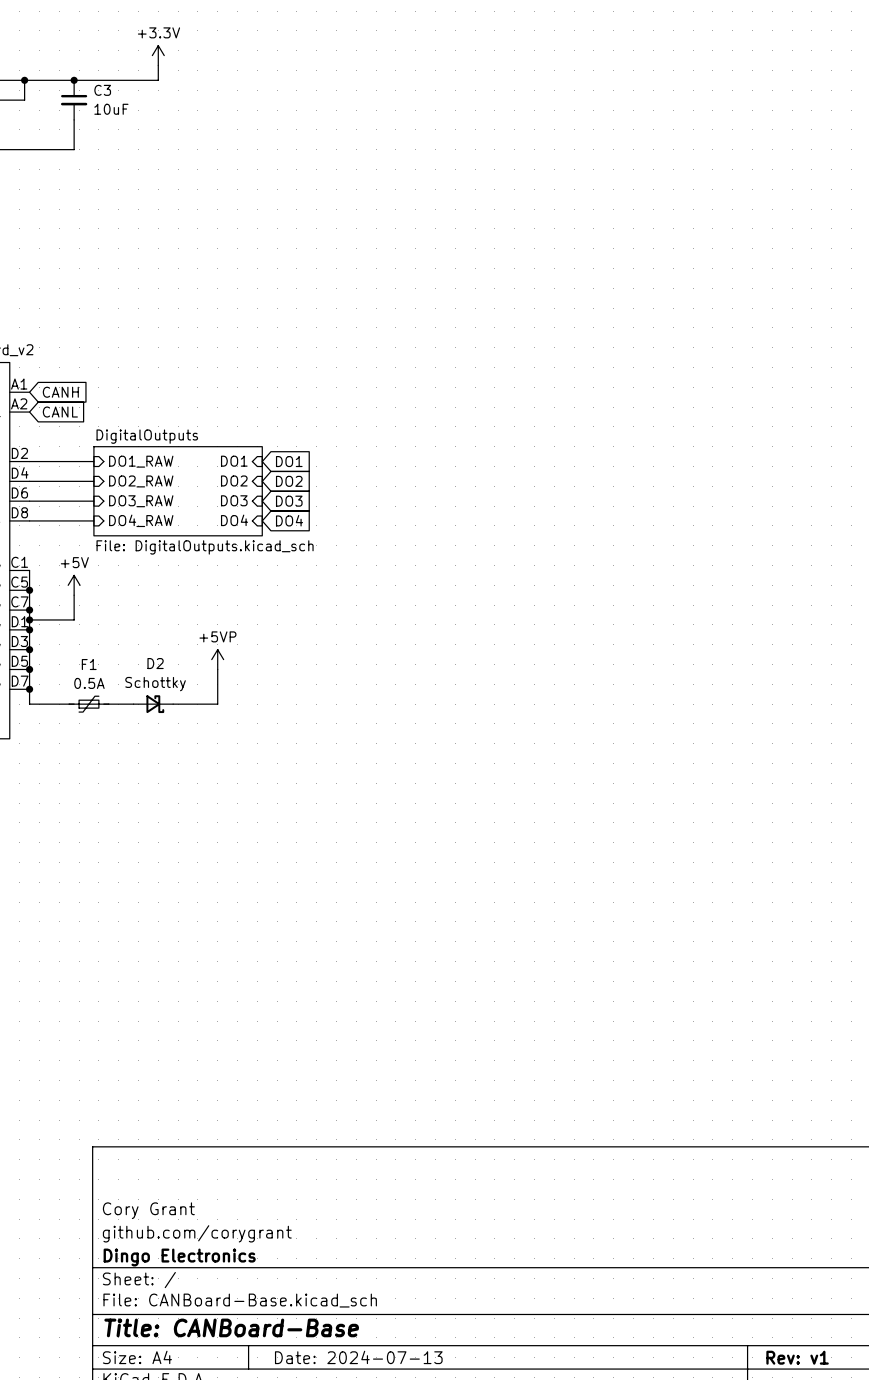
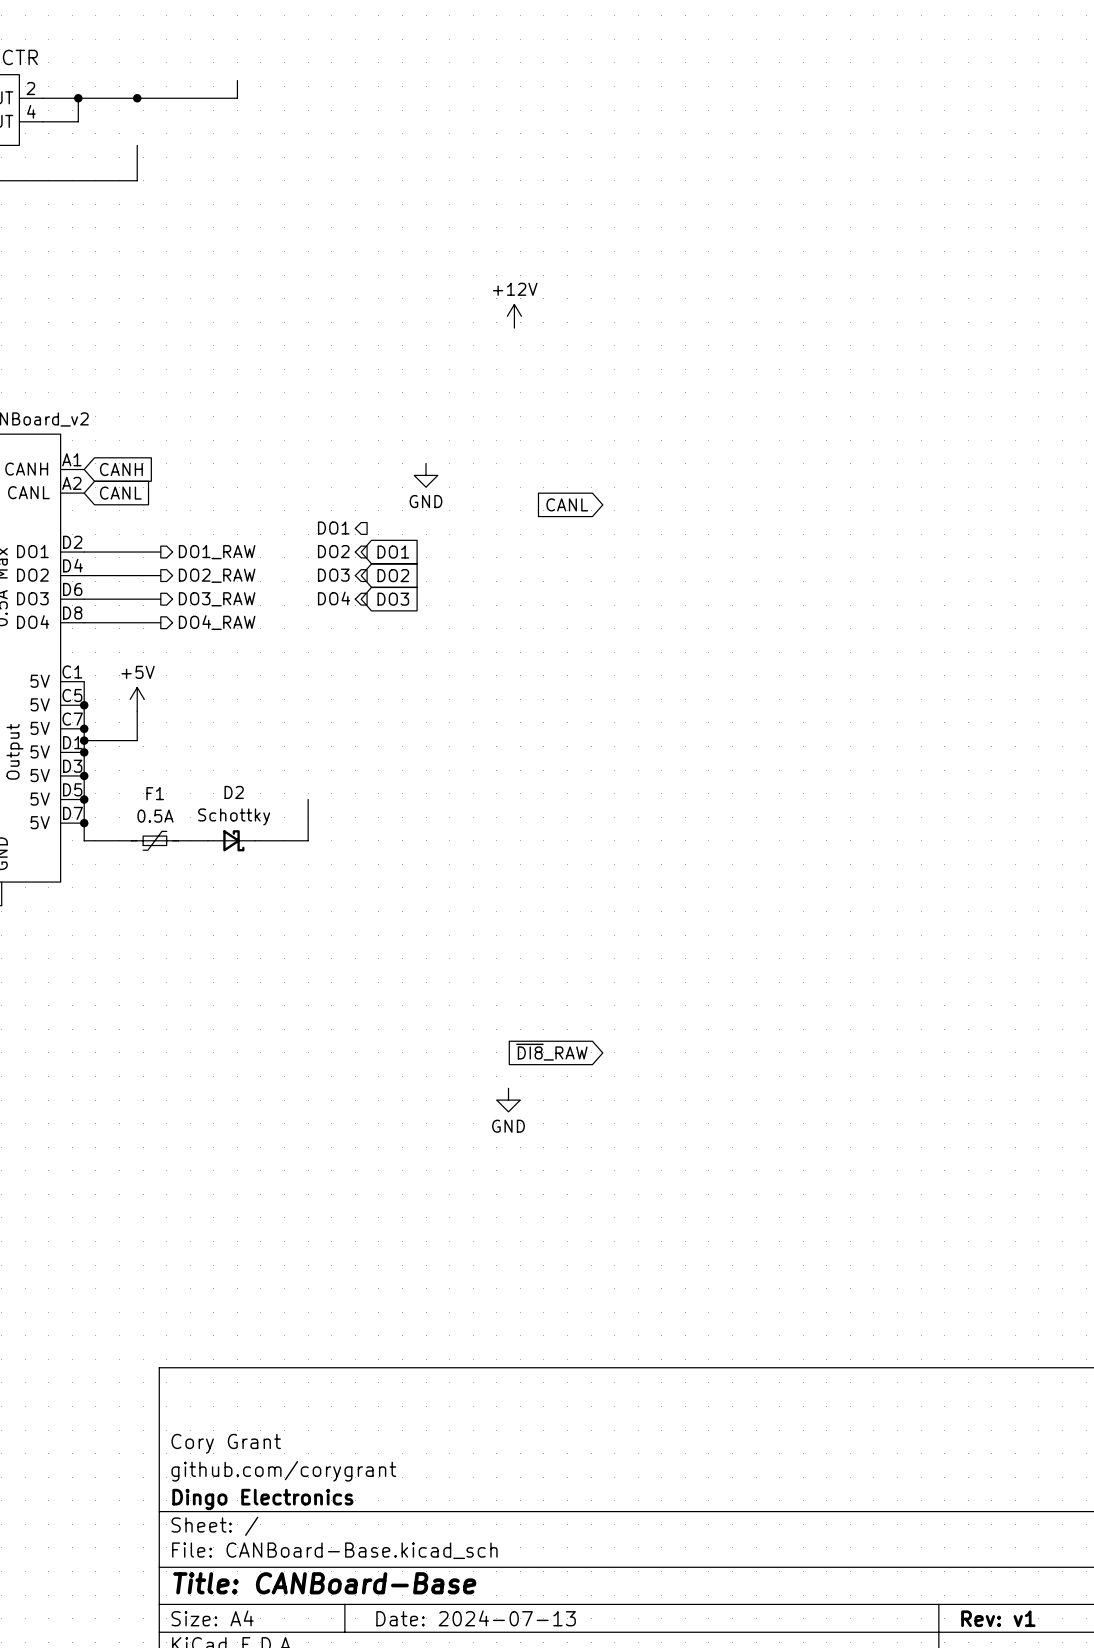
power symbol: +3.3V (158, 55) -> none
C3: 10uF (74, 100) -> none
power symbol: none -> +12V (514, 316)
power symbol: none -> GND (426, 475)
global label: none -> CANL (567, 504)
sheet pin position: DO1 (234, 461) -> DO1 (333, 528)
sheet pin position: DO2 (234, 480) -> DO2 (333, 551)
sheet DigitalOutputs: File: DigitalOutputs.kicad_sch (178, 491) -> none
sheet pin position: DO3 (234, 500) -> DO3 (333, 575)
sheet pin position: DO4 (234, 520) -> DO4 (334, 598)
global label: DO4 (289, 520) -> none
power symbol: +5VP (217, 659) -> none
global label: none -> ~{DI8}_RAW (551, 1052)
power symbol: none -> GND (508, 1100)

